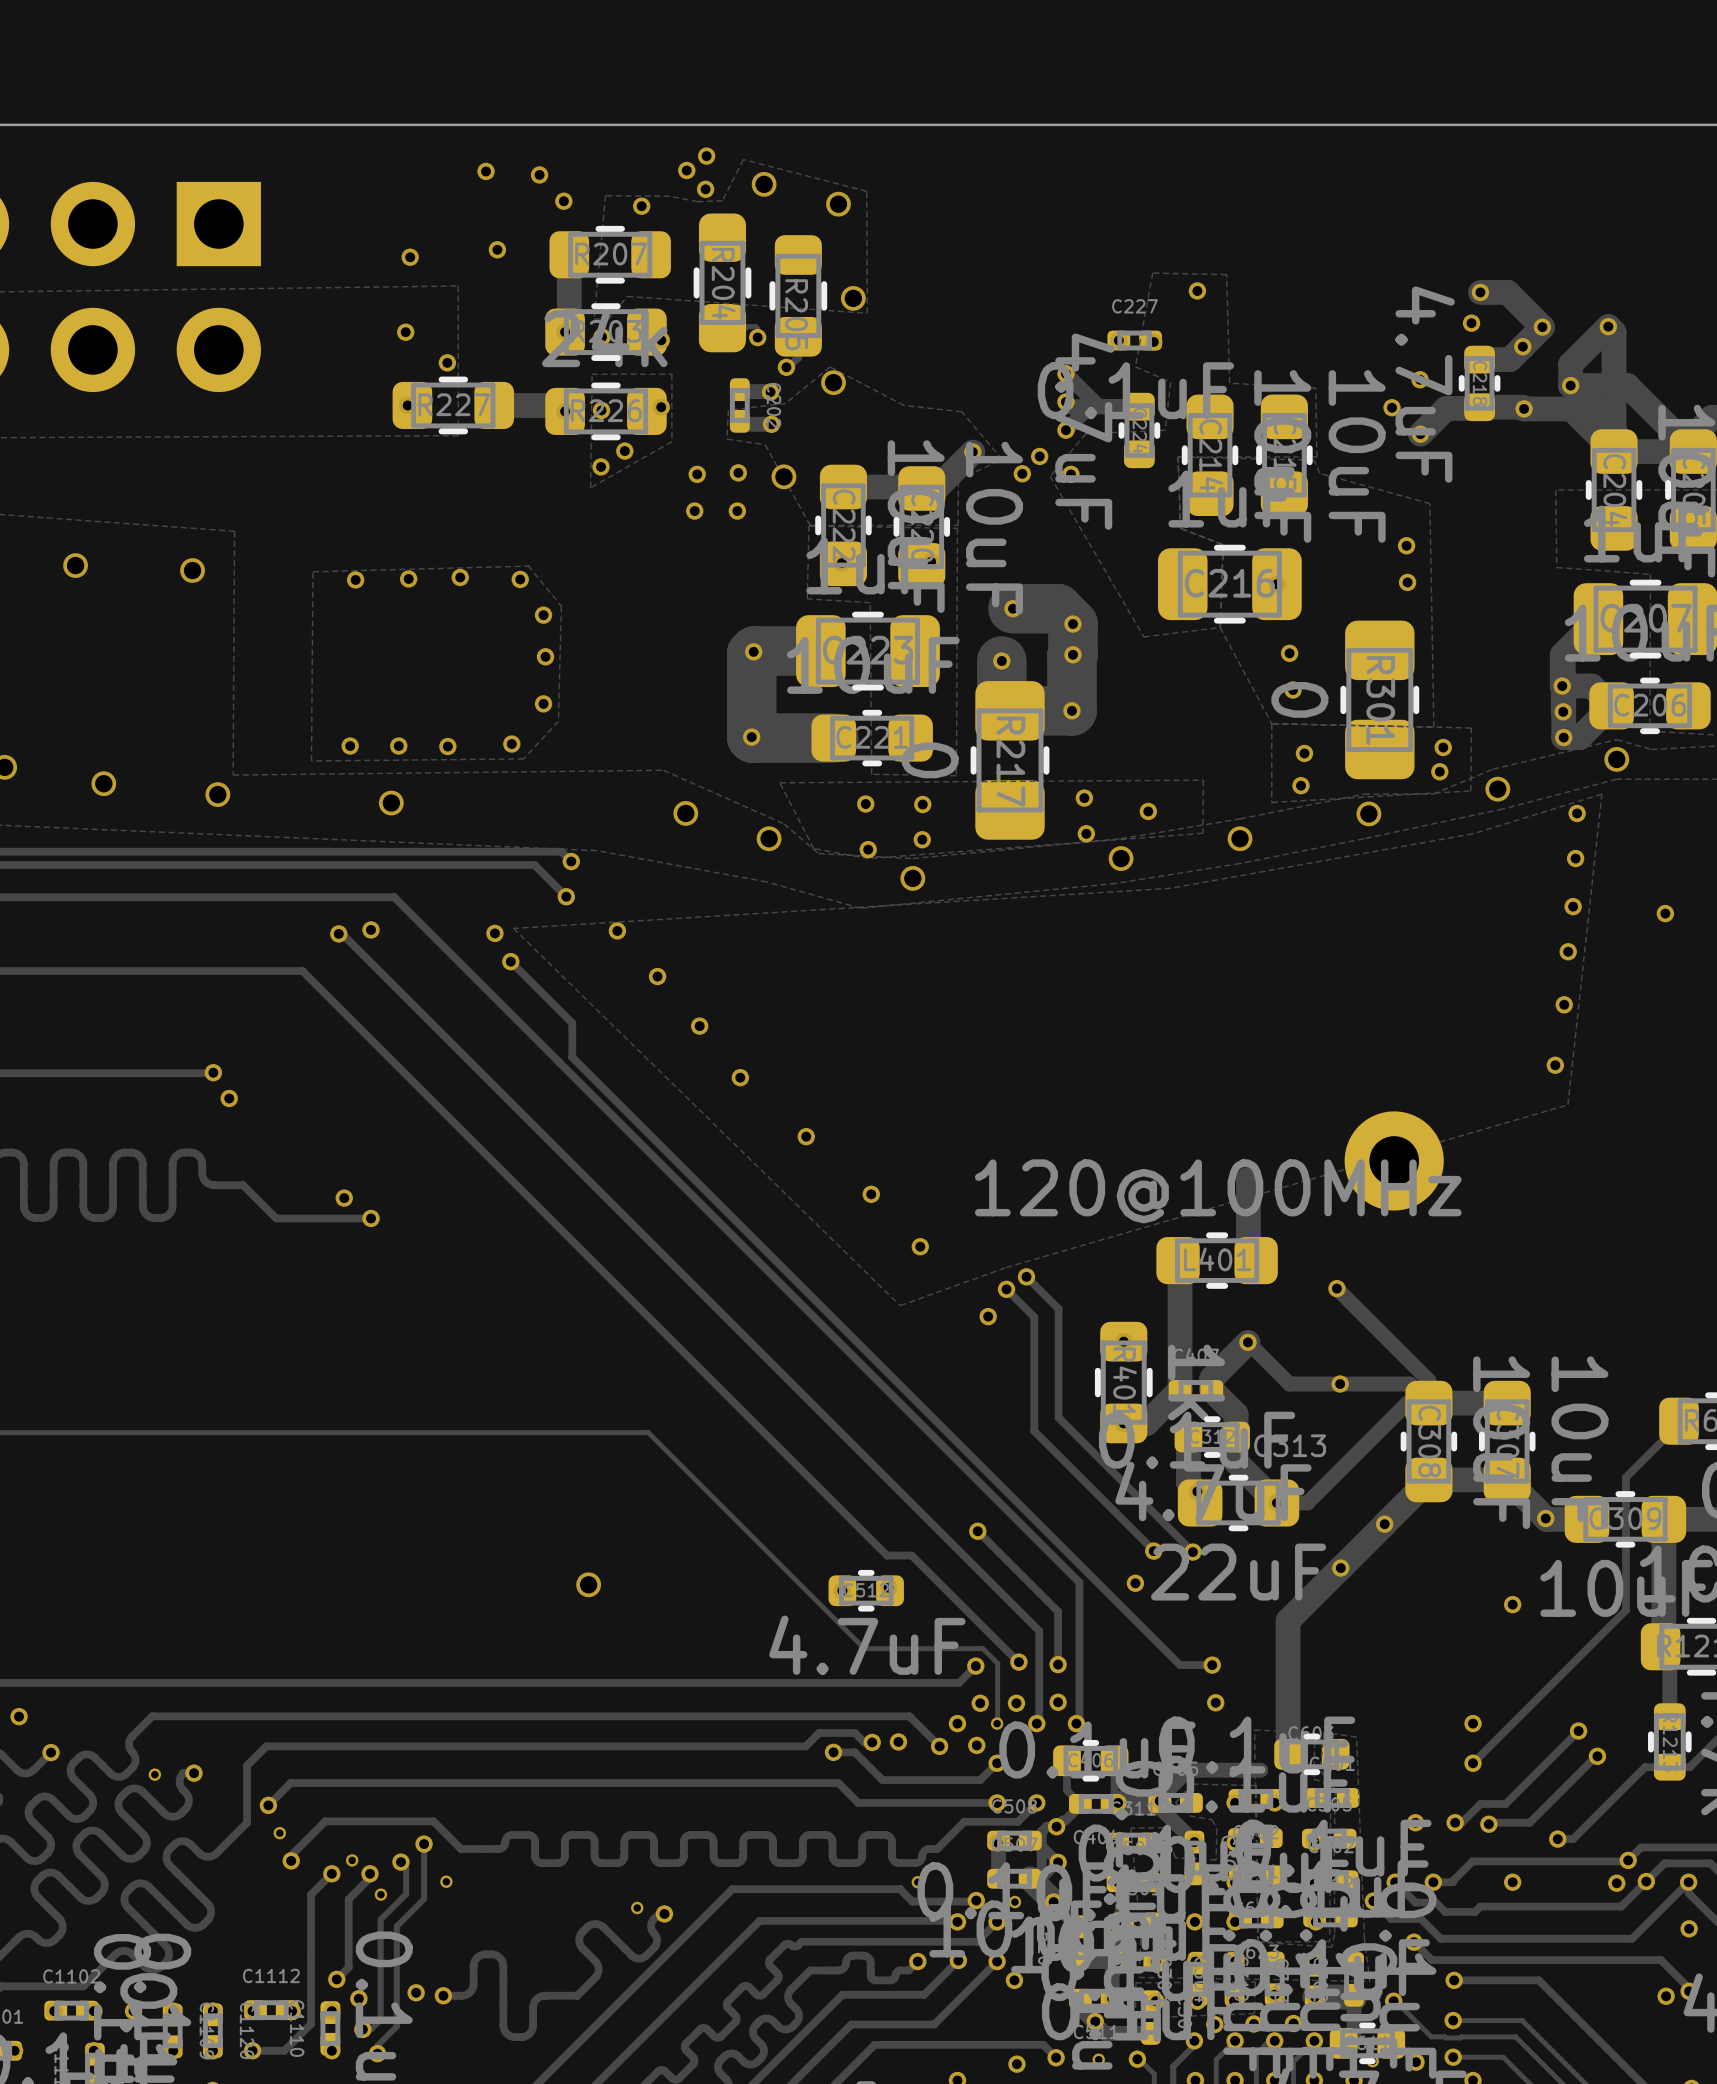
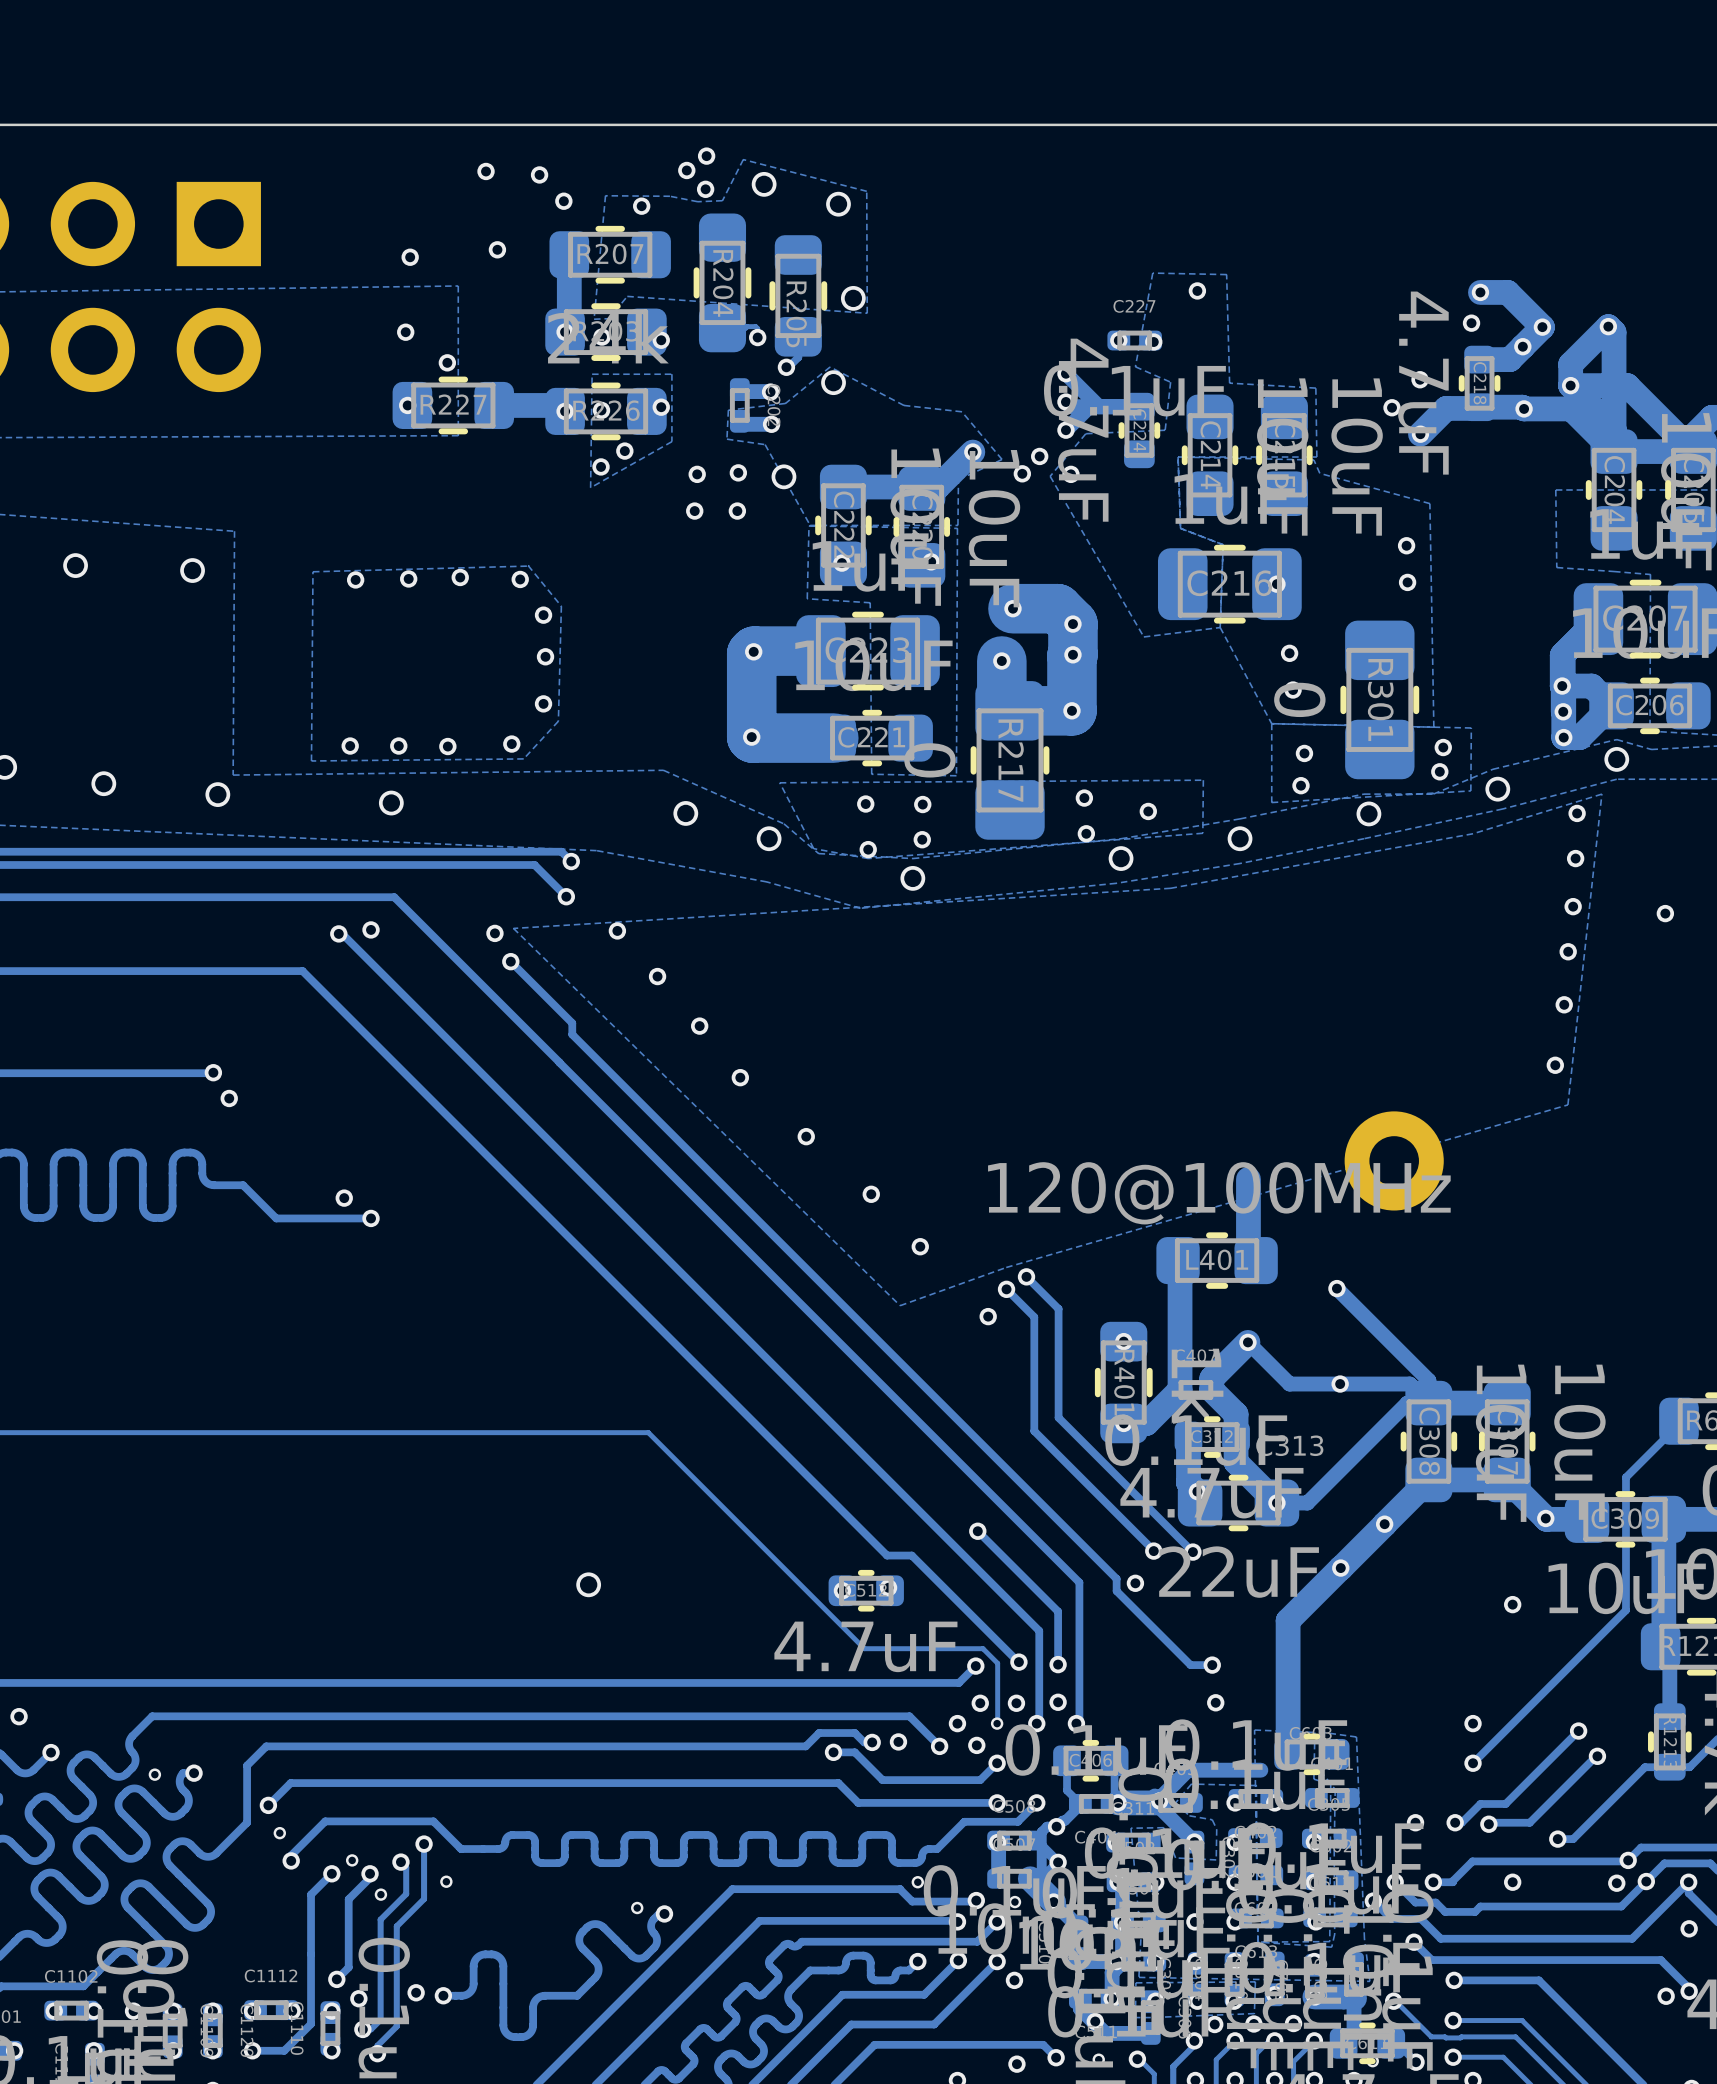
track: (572, 1034) (572, 1057) (1180, 1665) (1190, 1665) -> (572, 1034) (1116, 1578) (1116, 1591) (1190, 1665)

